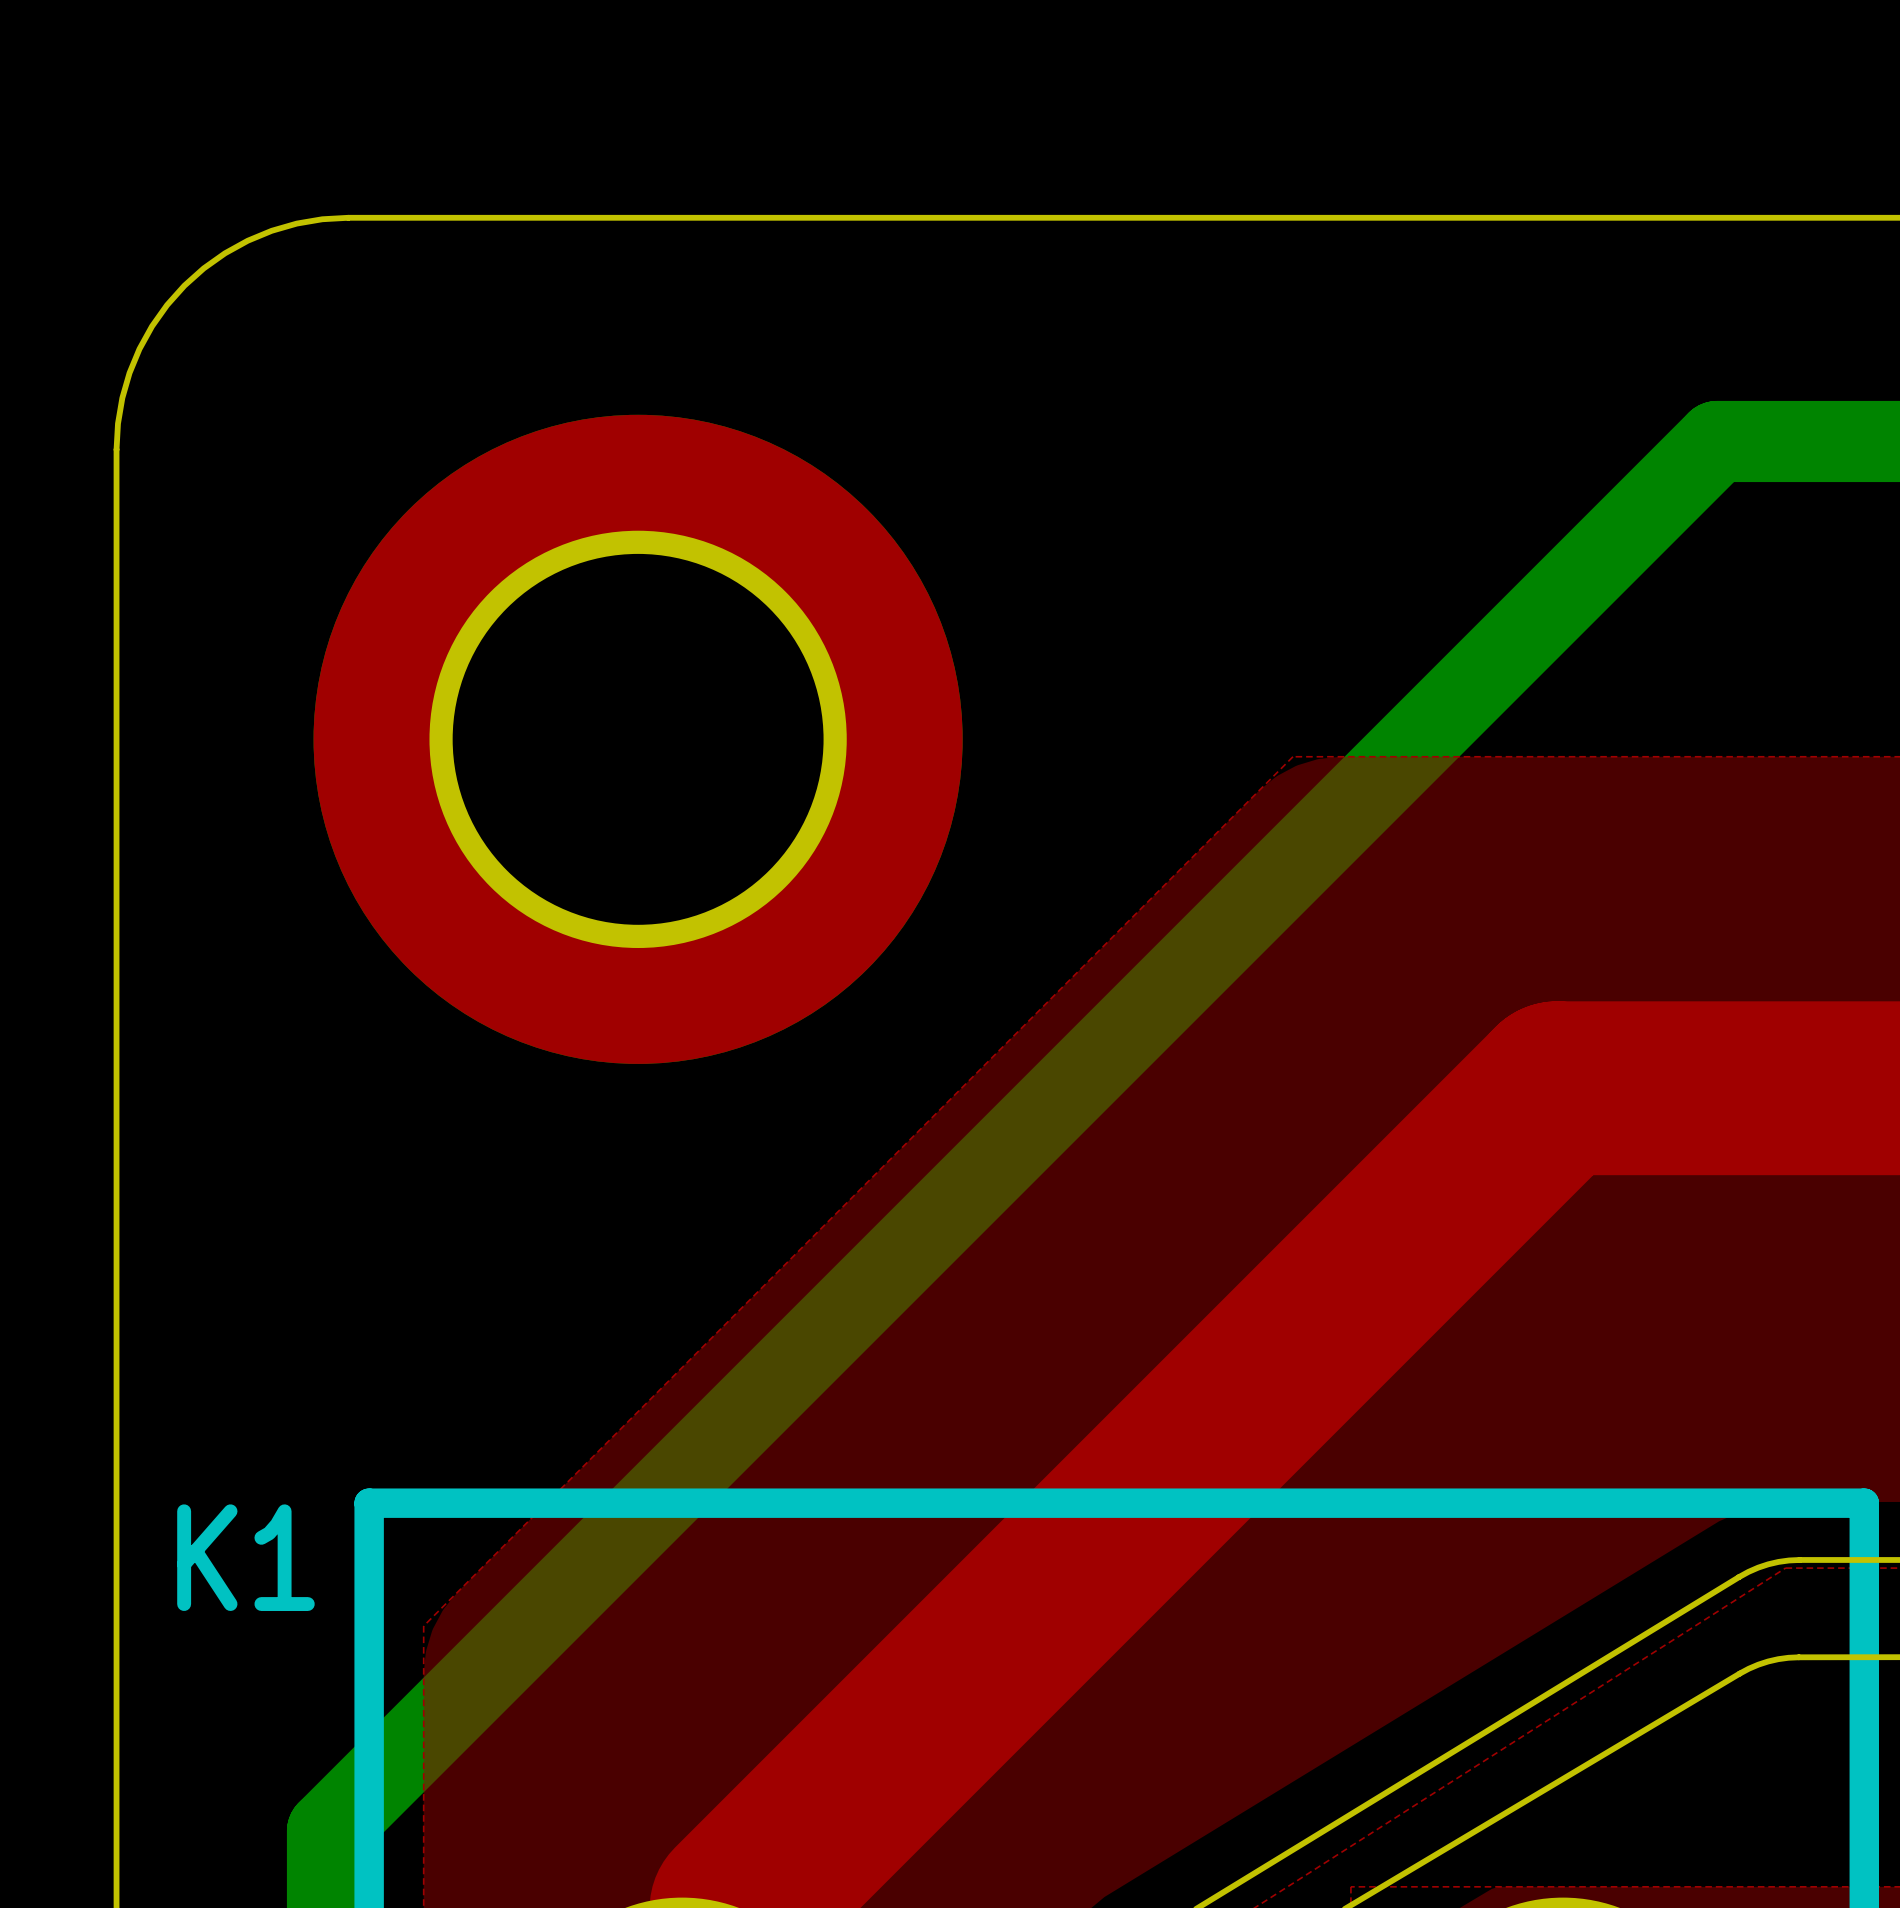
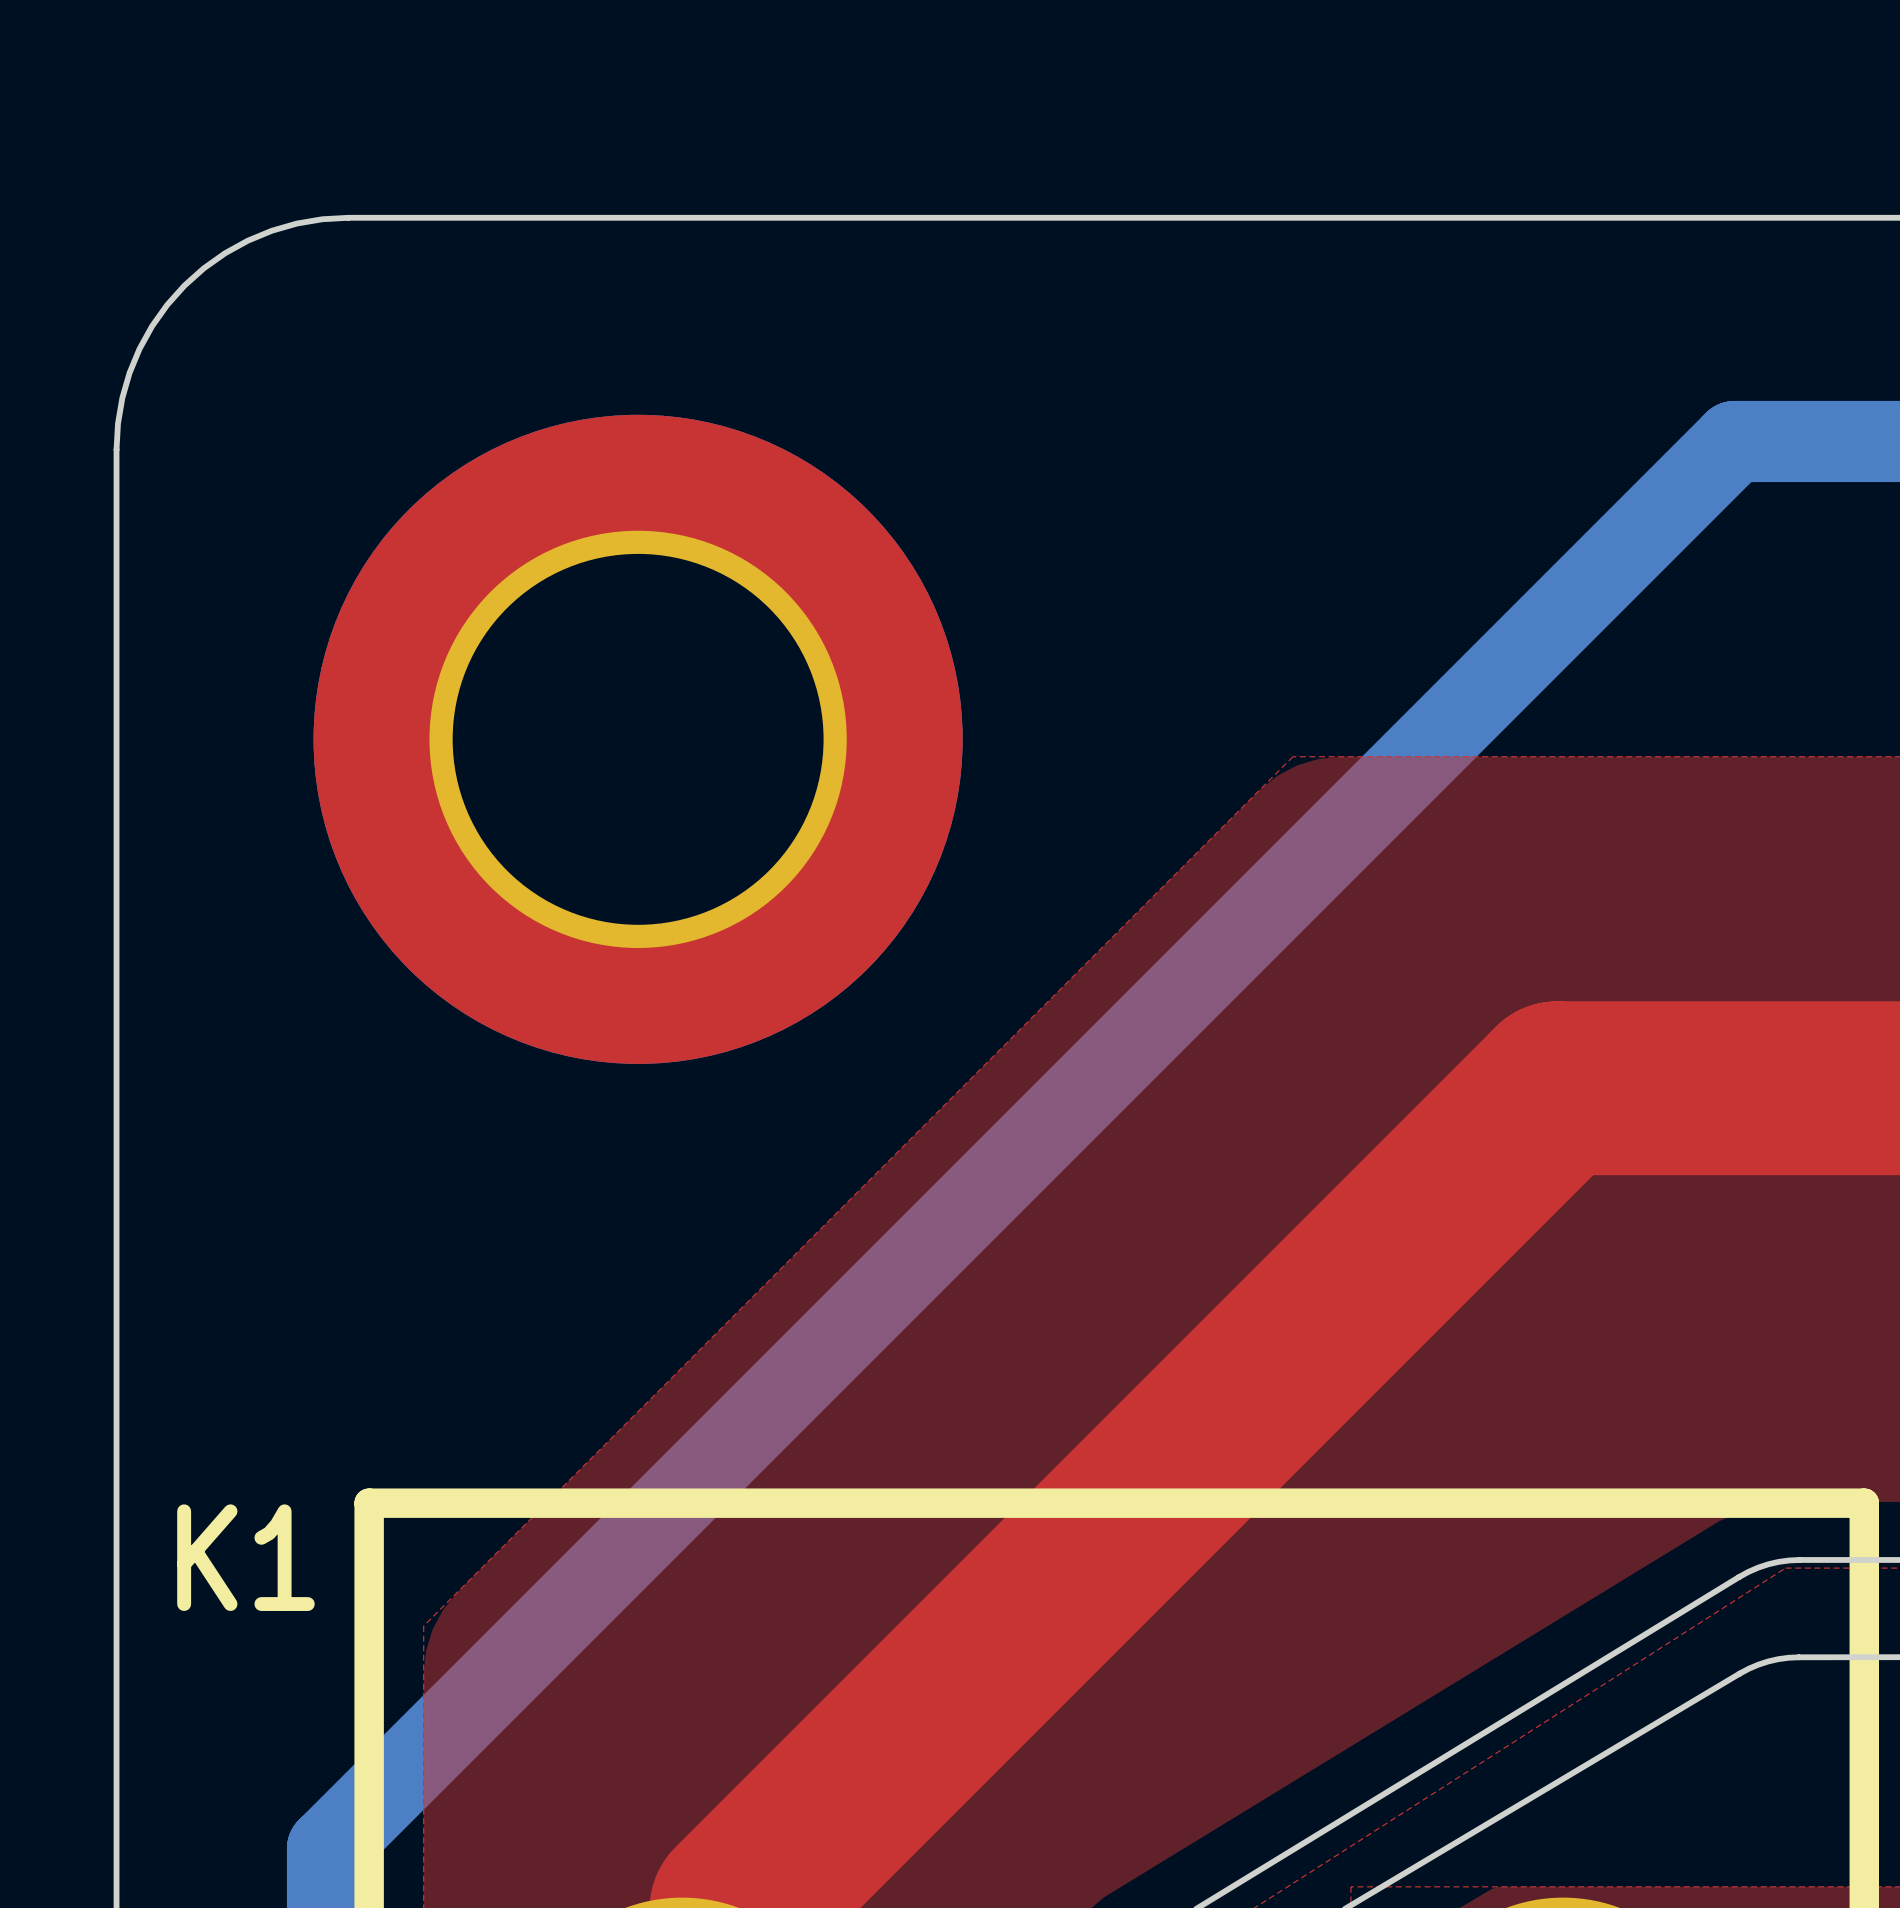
bottom track: (1734, 441) (1717, 441) (327, 1831) (327, 1848) -> (1734, 441) (327, 1848)

